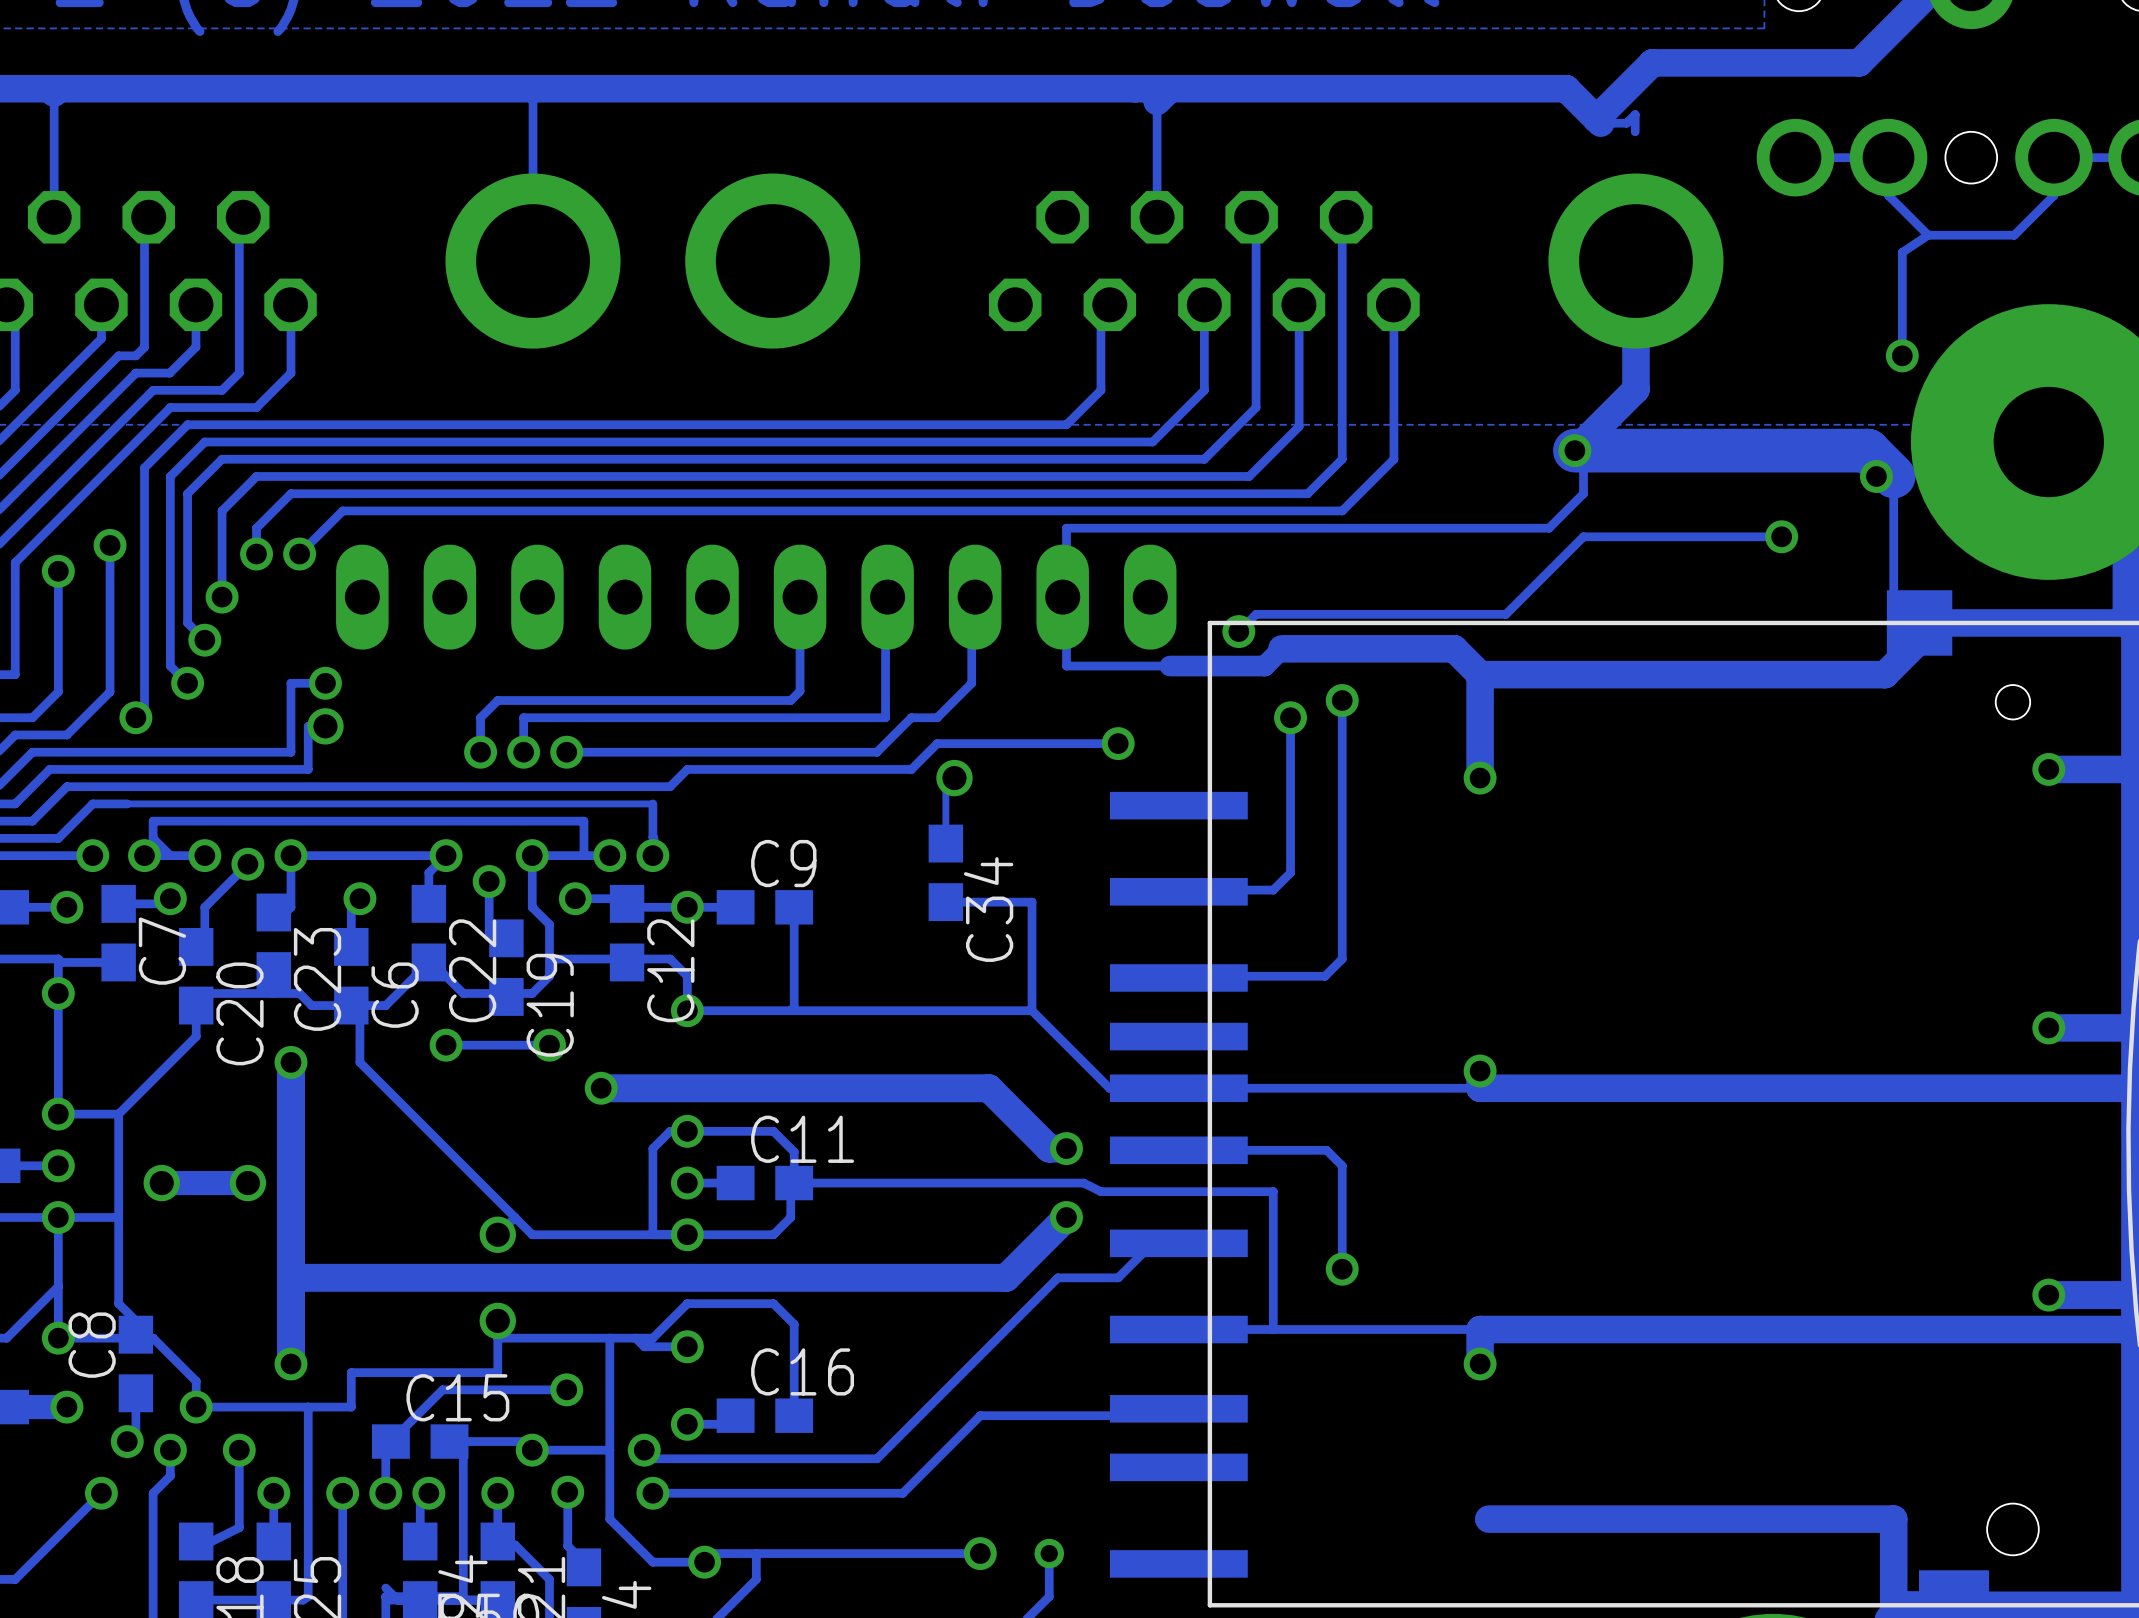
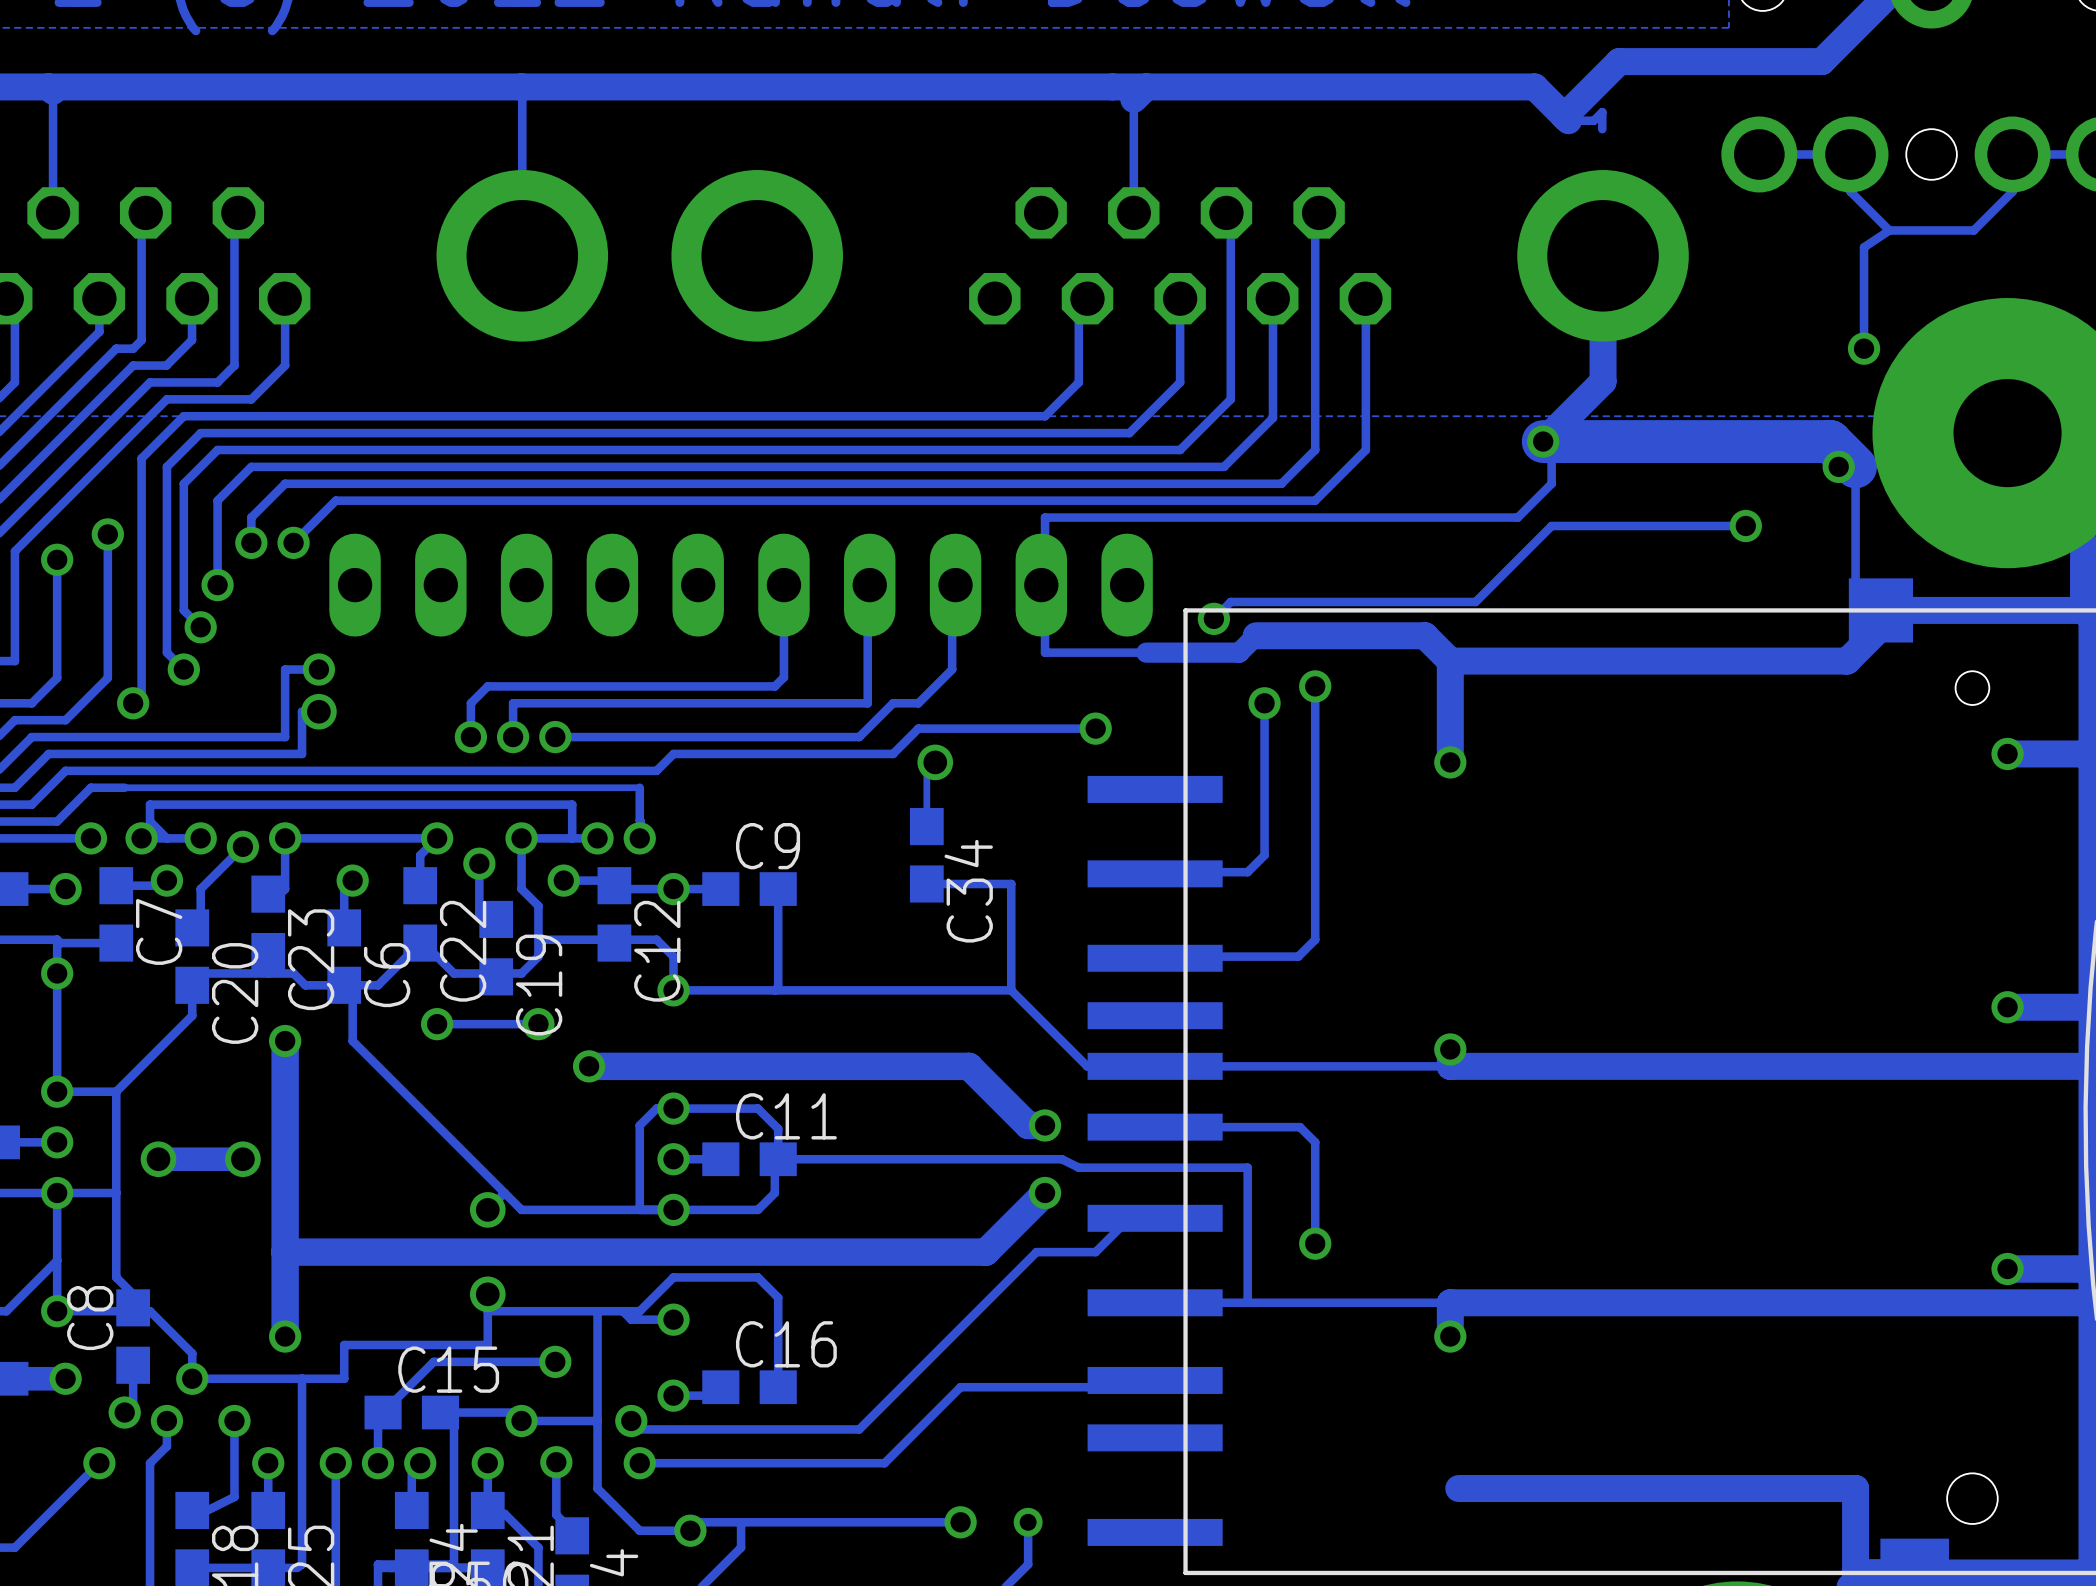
track: (385, 1588) (397, 1600) -> none

